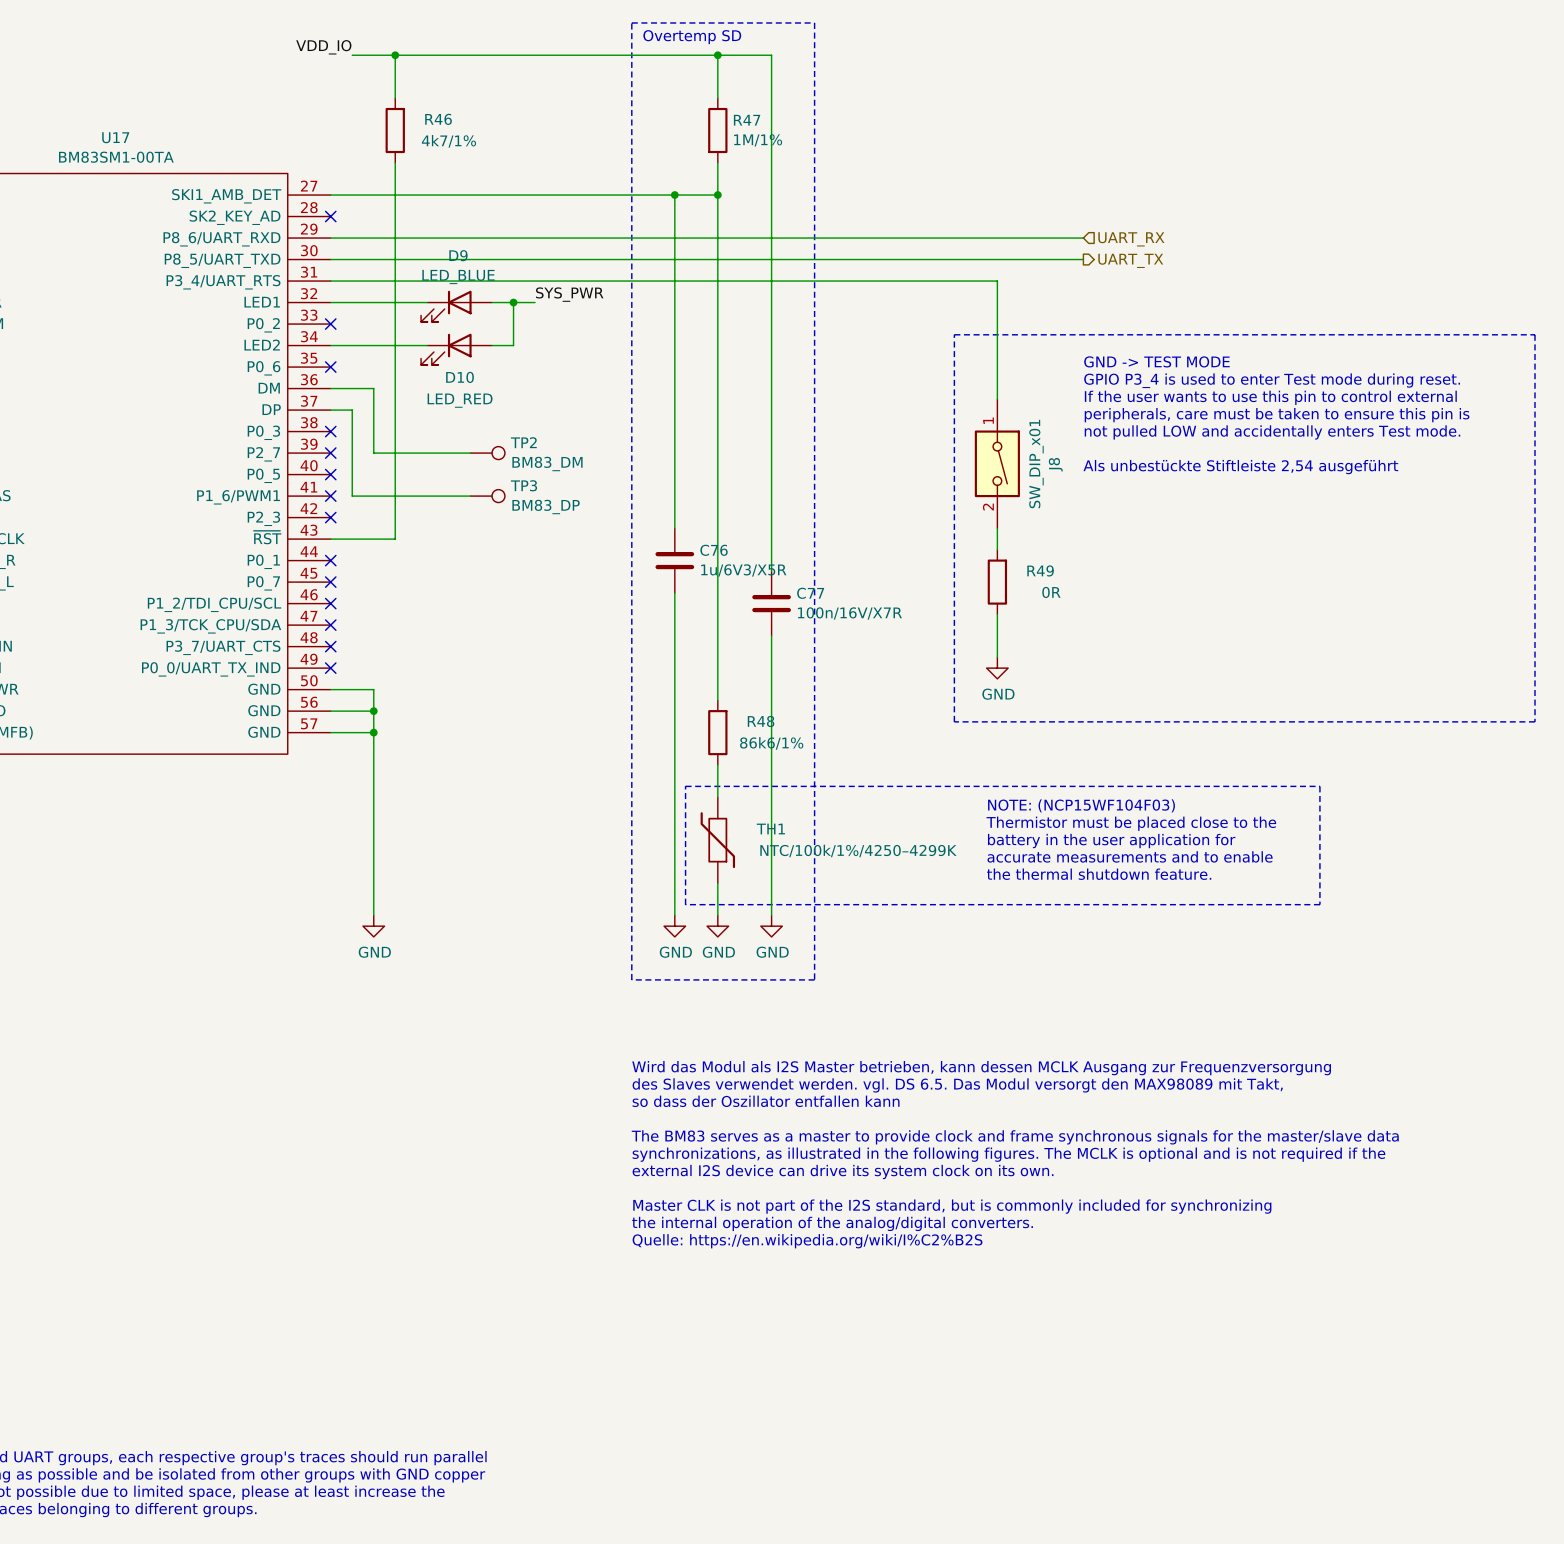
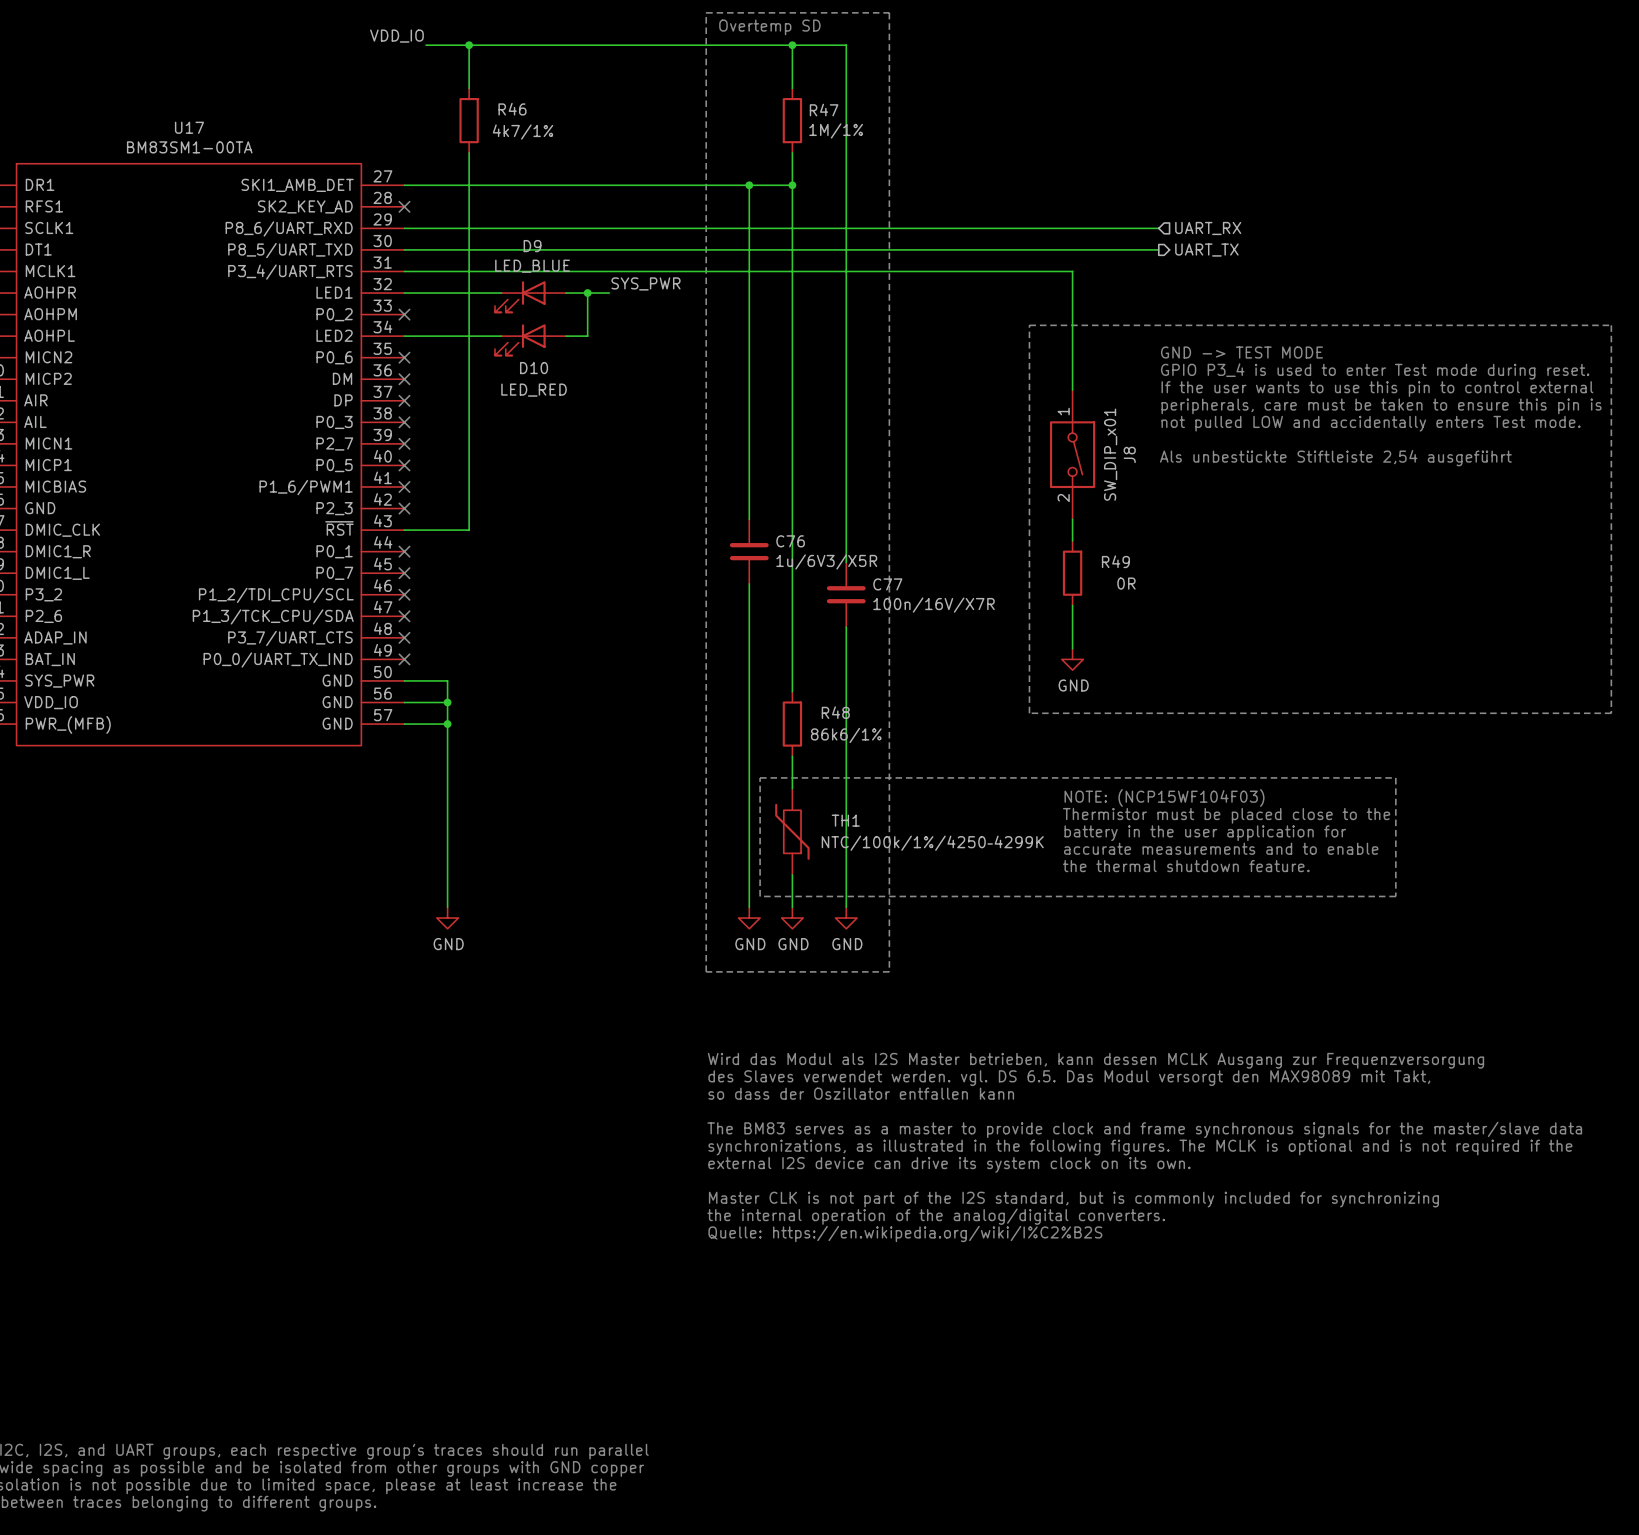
wire: (330, 388) (373, 388) (373, 453) (470, 453) -> none
no-connect mark: none -> (404, 379)
wire: (330, 410) (352, 410) (352, 496) (470, 496) -> none
no-connect mark: none -> (404, 400)
TP2: BM83_DM (487, 453) -> none
TP3: BM83_DP (487, 496) -> none

